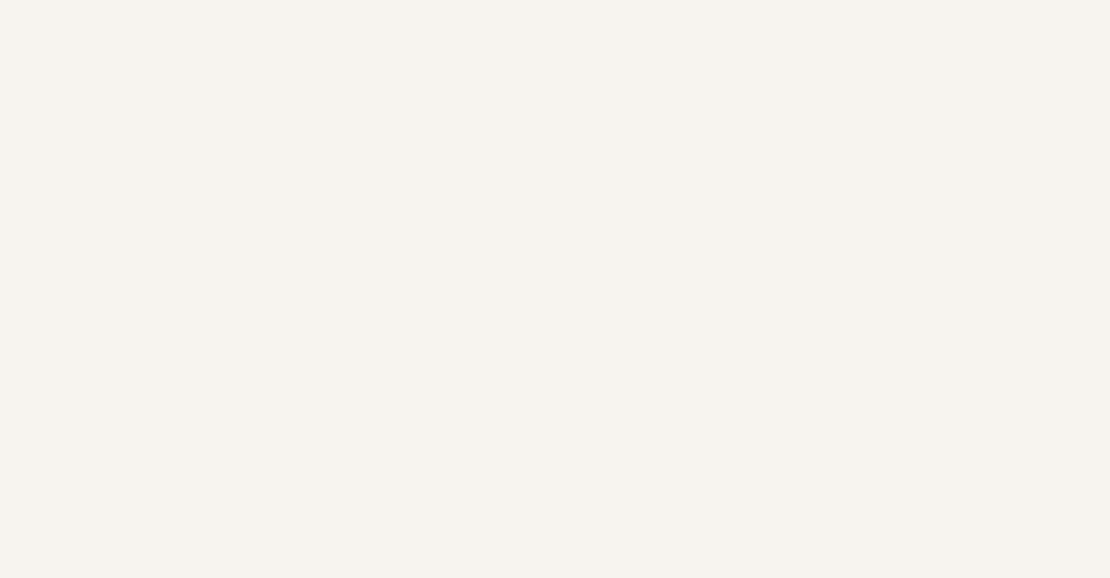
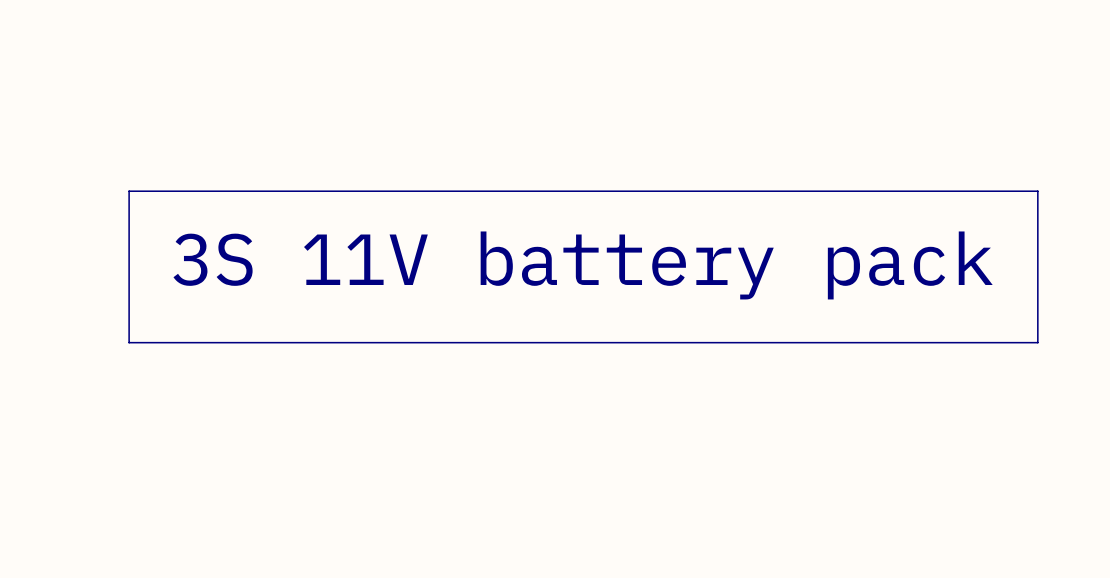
line: none -> (129, 191) (1037, 191) (1037, 342) (129, 342) (129, 191)
text: none -> 3S 11V battery pack (583, 265)

